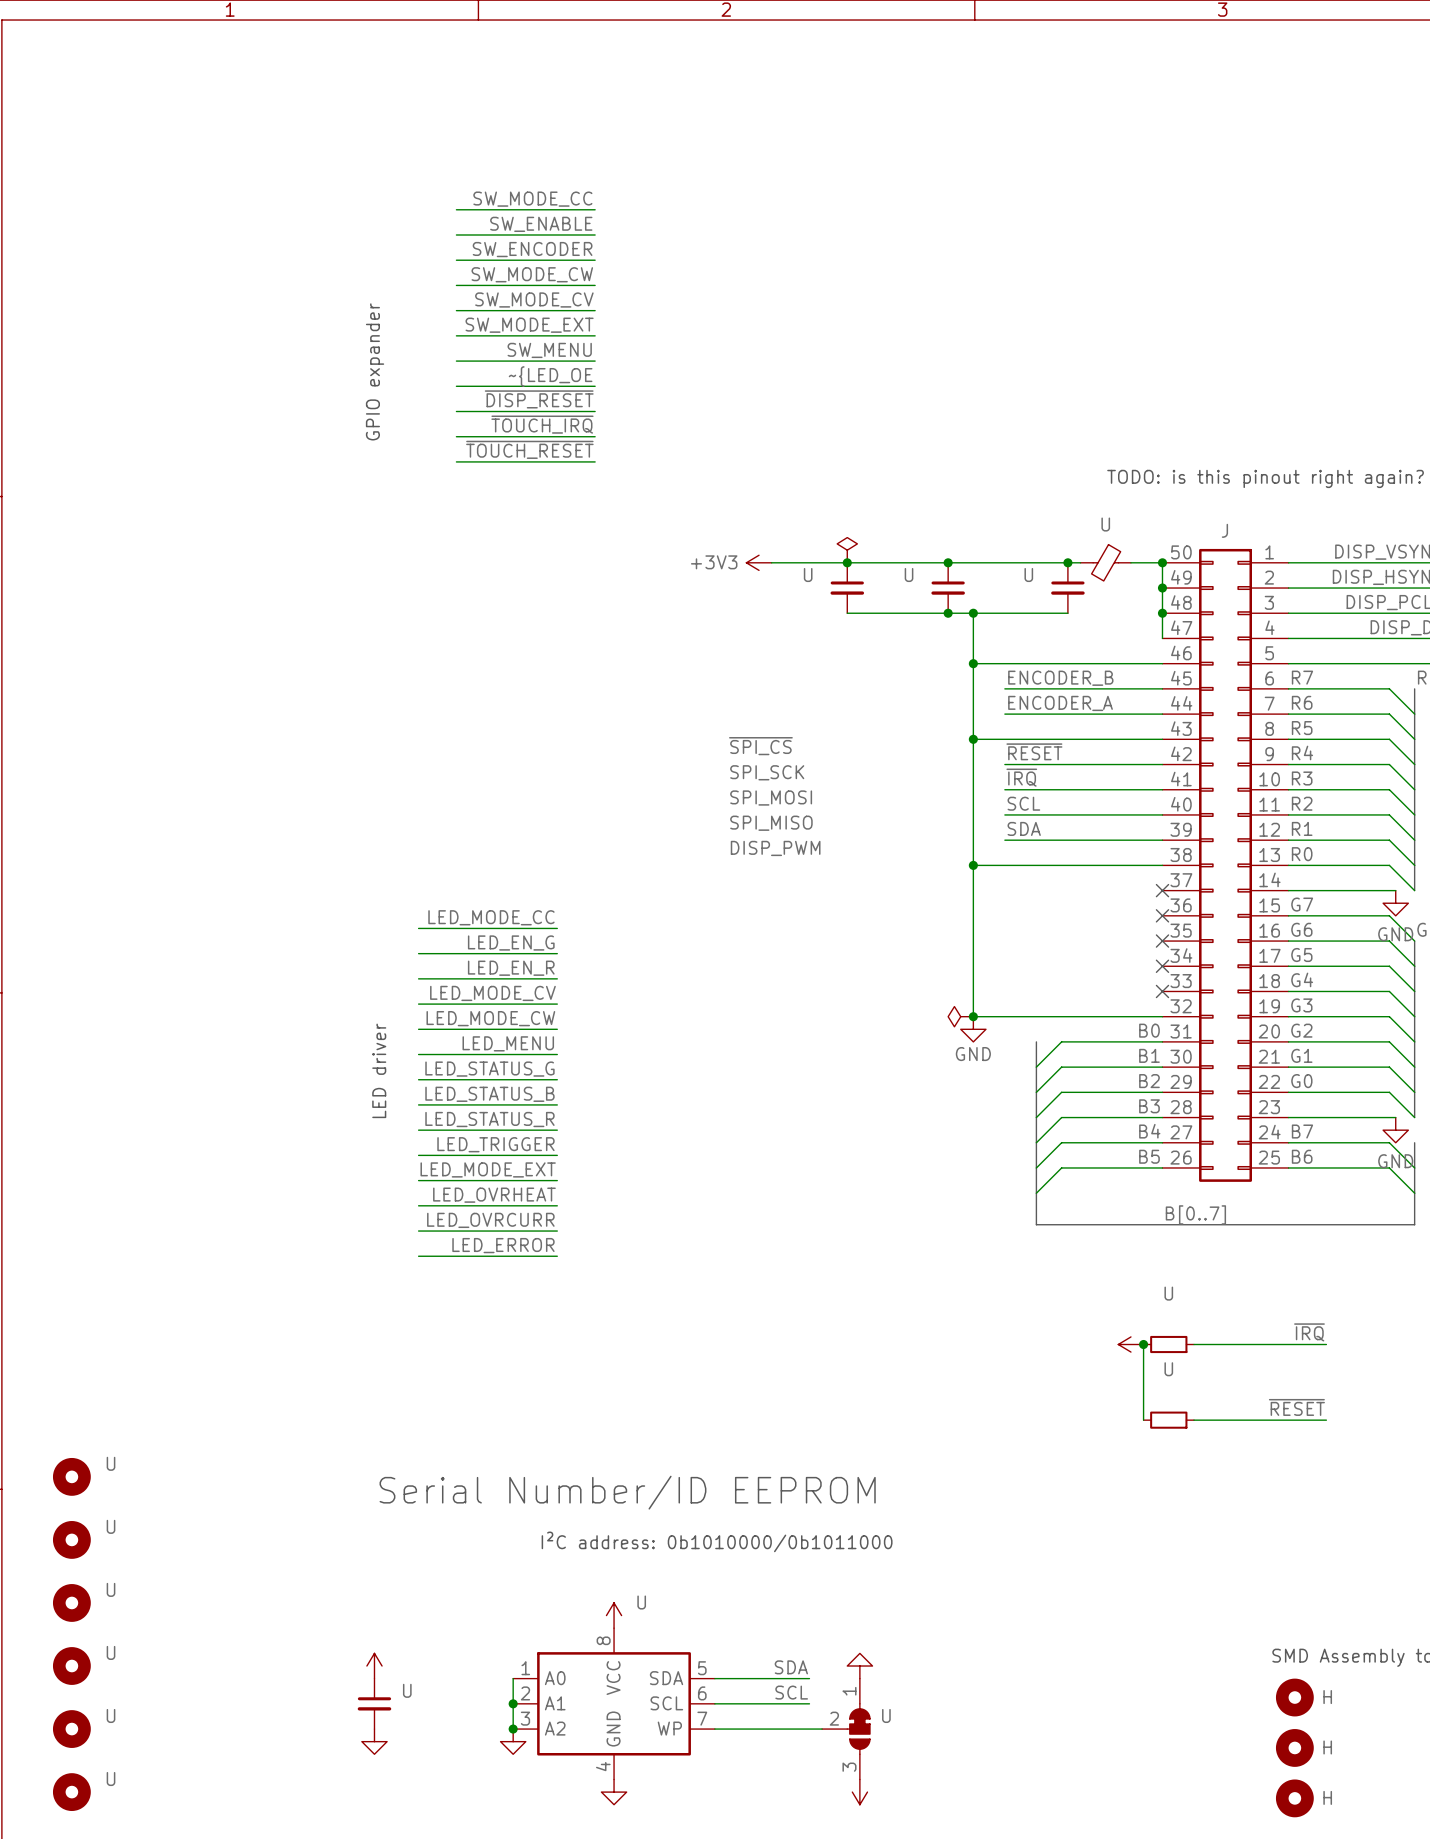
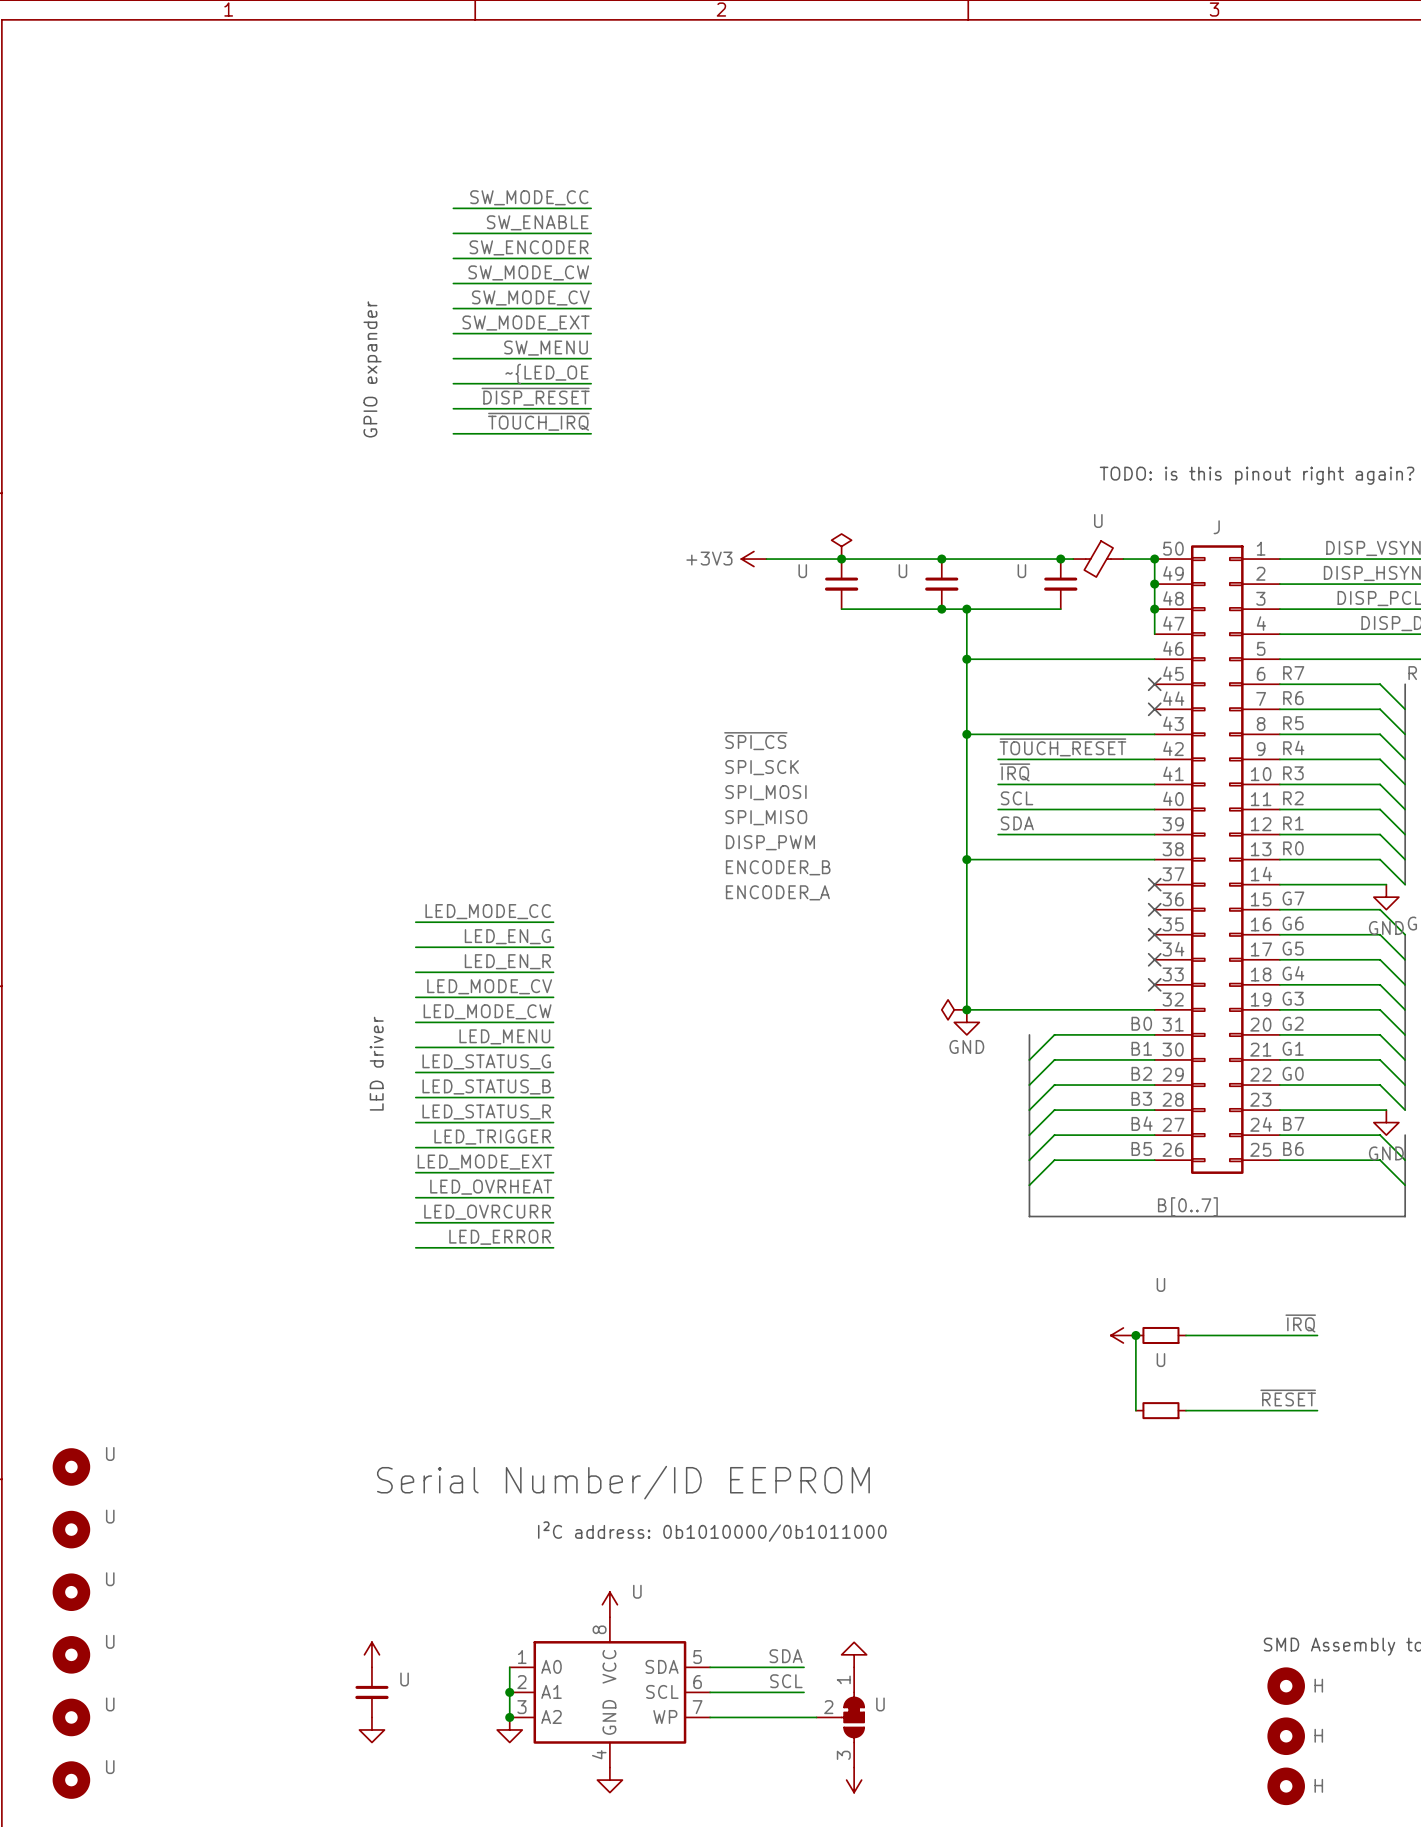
label: ~{TOUCH_RESET} (529, 449) -> none
wire: (456, 461) (595, 461) -> none
label: ENCODER_B (1060, 678) -> none
wire: (1004, 688) (1162, 688) -> none
no-connect mark: none -> (1154, 684)
label: ENCODER_A (1060, 703) -> none
wire: (1004, 714) (1162, 714) -> none
no-connect mark: none -> (1154, 709)
label: ~{RESET} (1034, 751) -> ~{TOUCH_RESET} (1062, 747)
label: none -> ENCODER_B (778, 867)
label: none -> ENCODER_A (777, 892)

